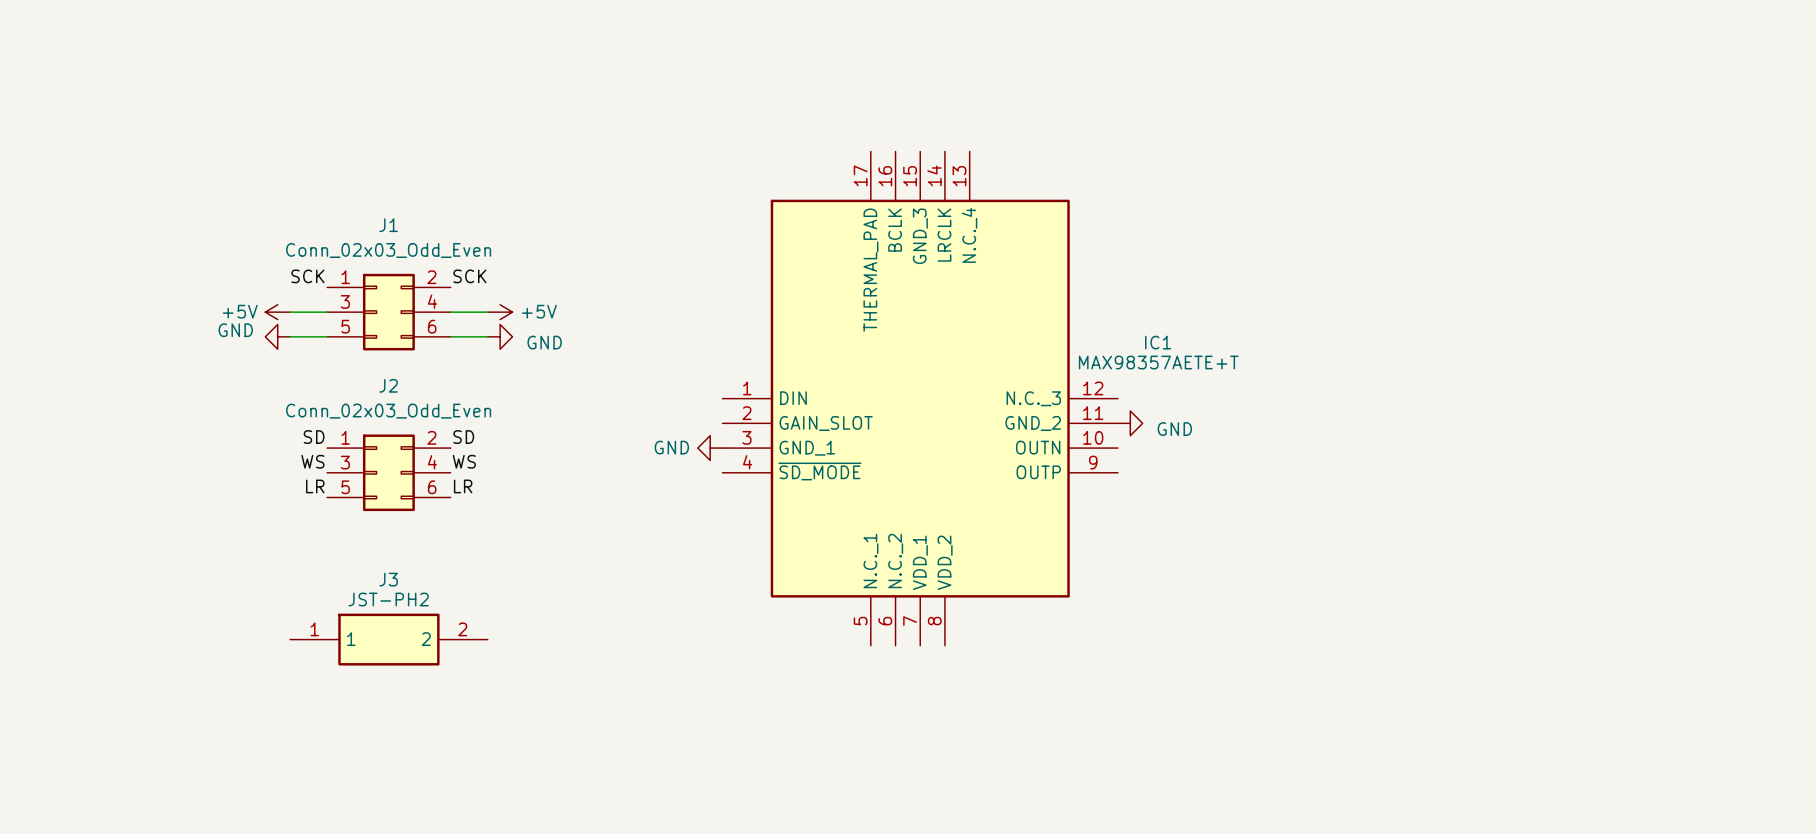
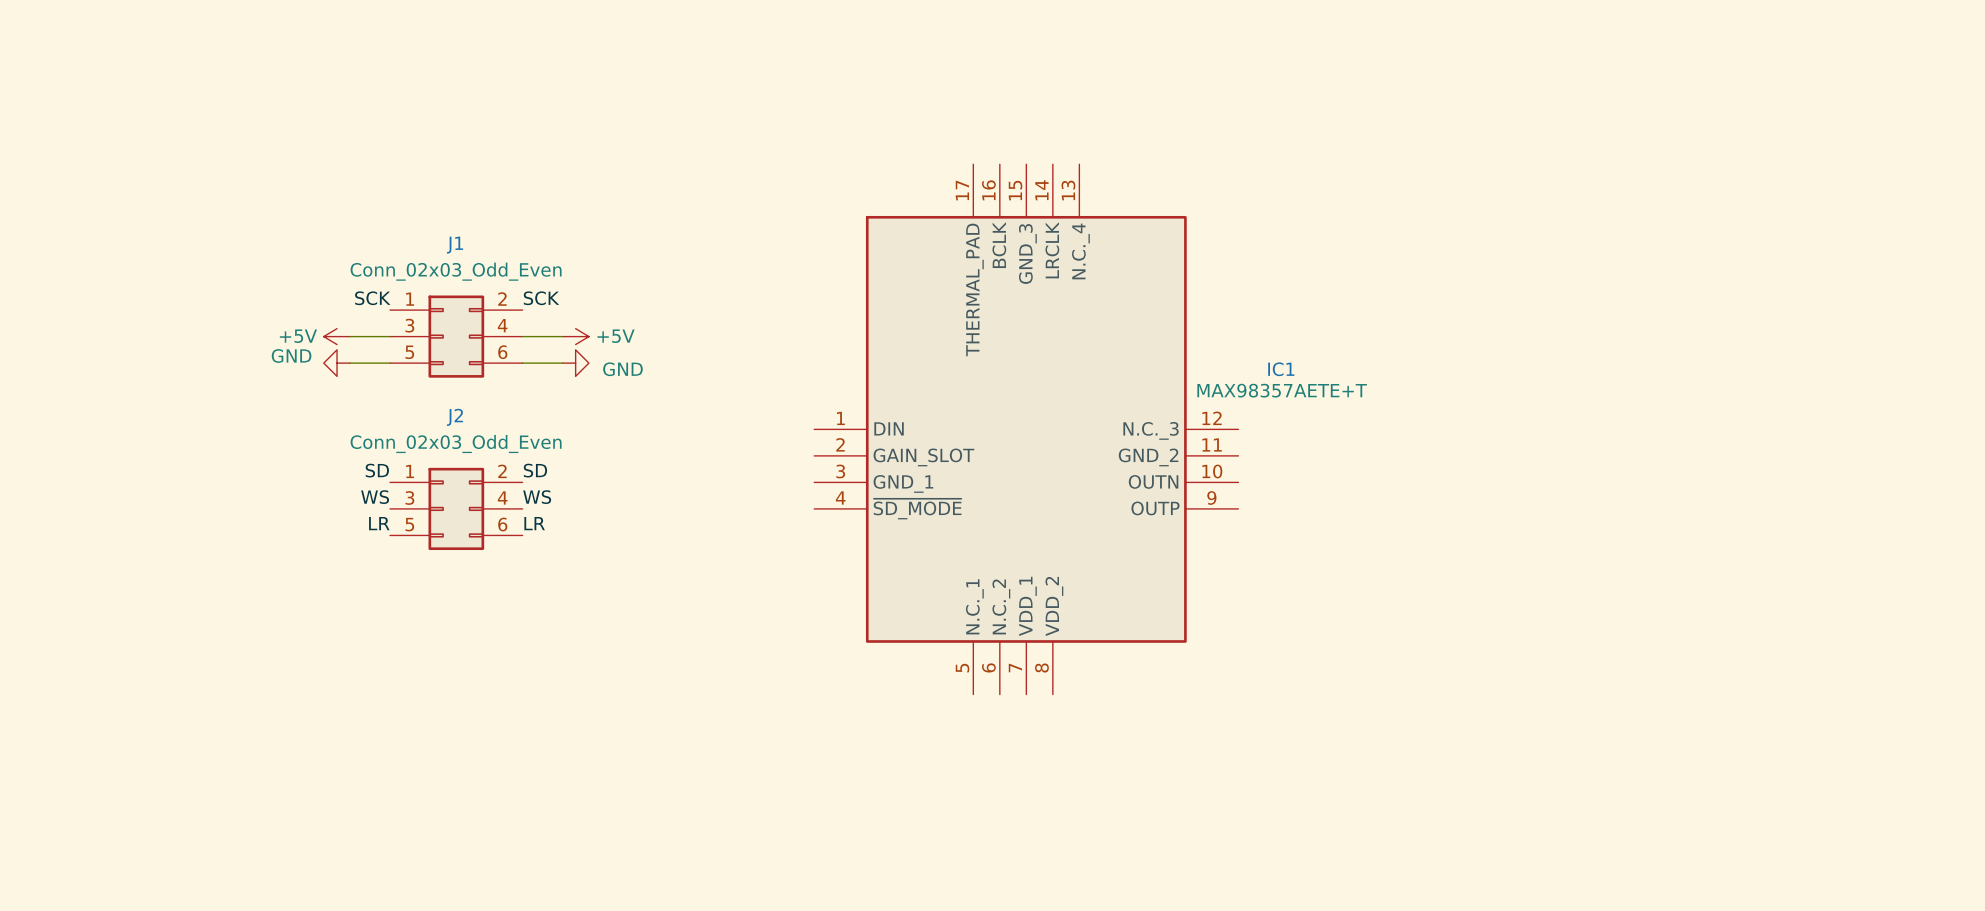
power symbol: GND (1130, 423) -> none
power symbol: GND (710, 448) -> none
J3: JST-PH2 (388, 639) -> none

